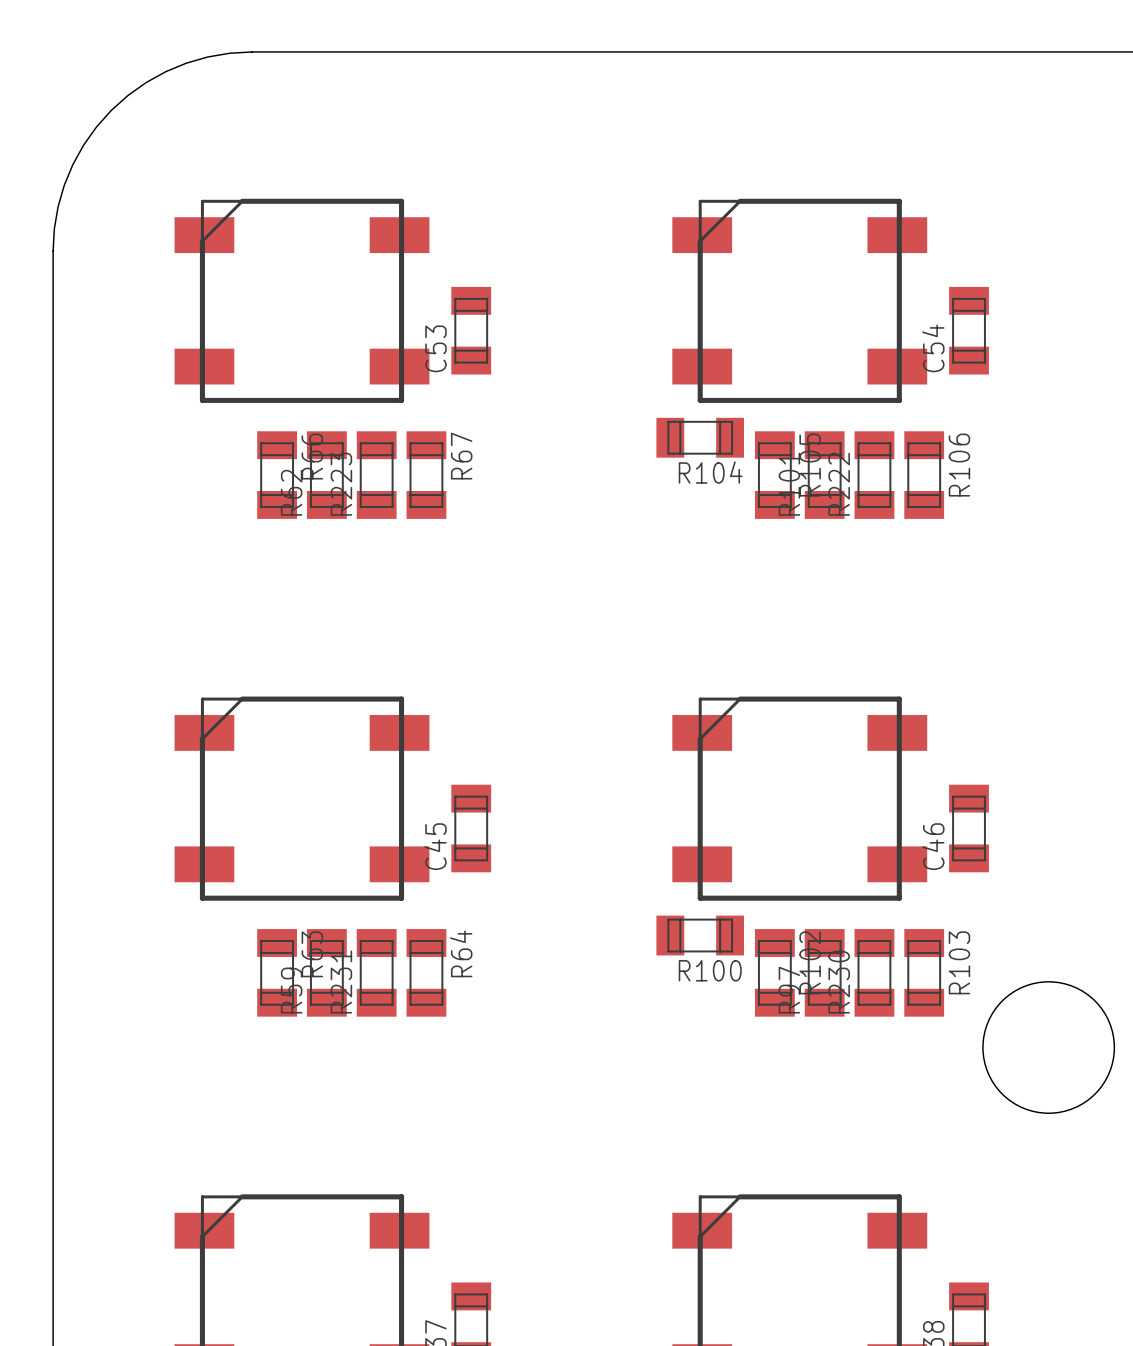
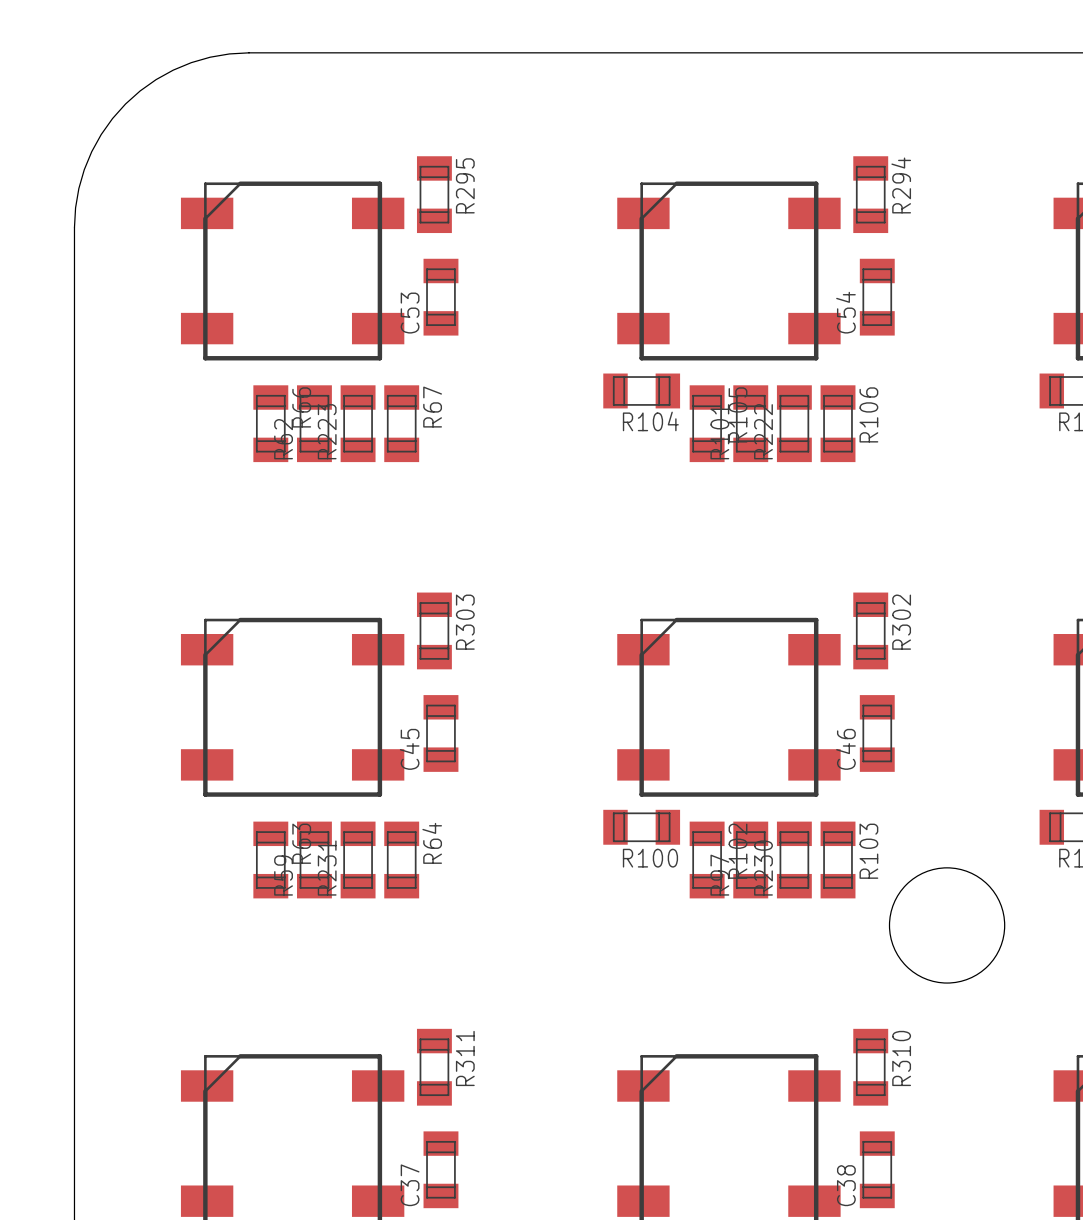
R295: none -> (434, 194)
R294: none -> (870, 194)
R303: none -> (434, 630)
R302: none -> (870, 630)
R311: none -> (434, 1067)
R310: none -> (870, 1067)

